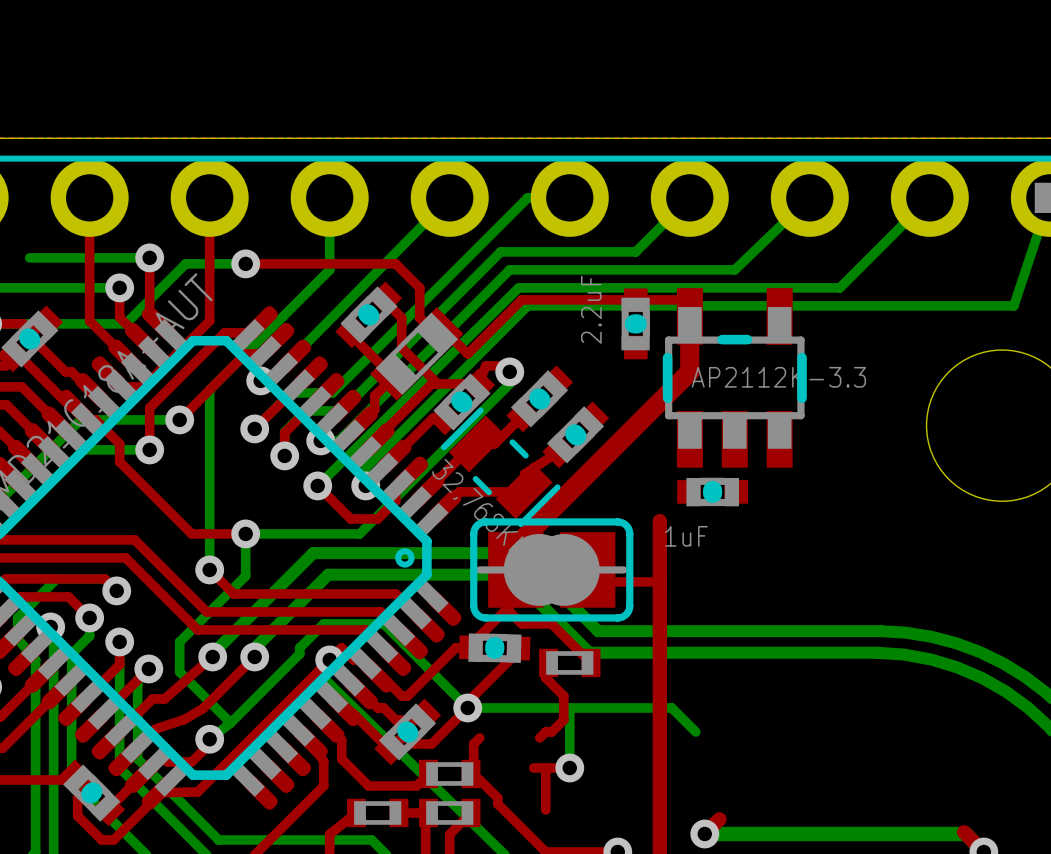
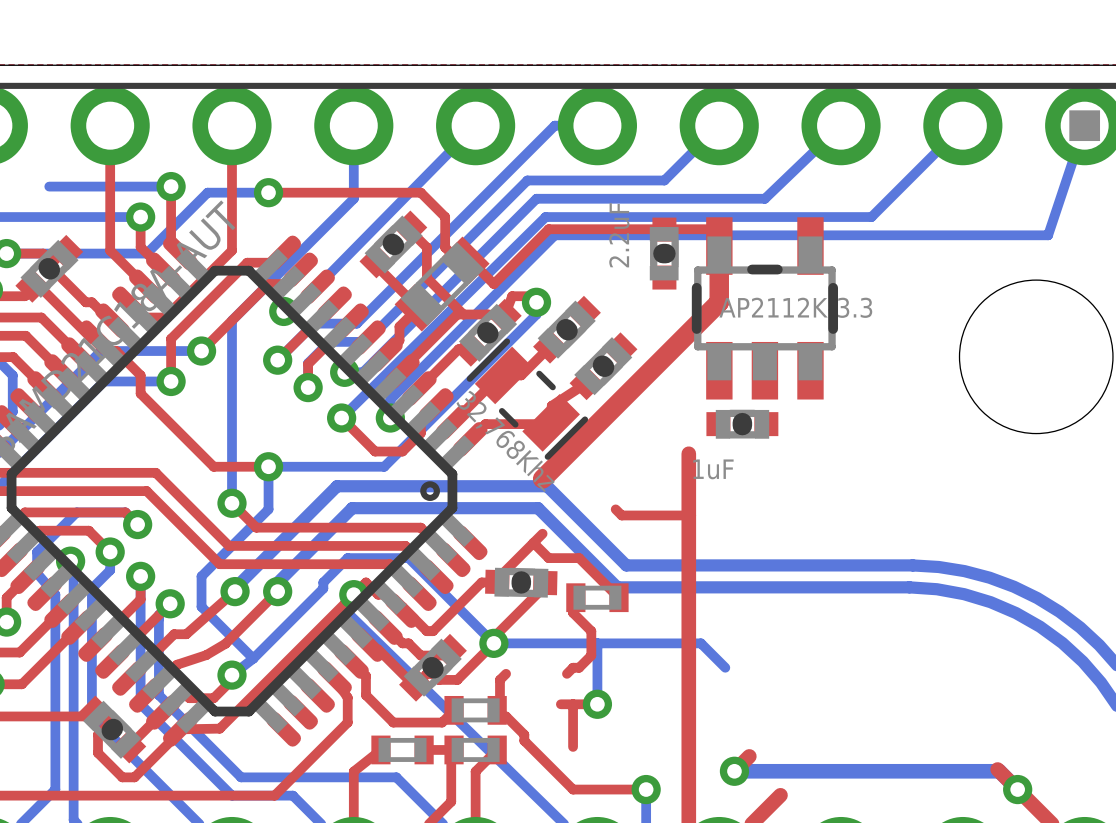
part: (551, 569) -> none

